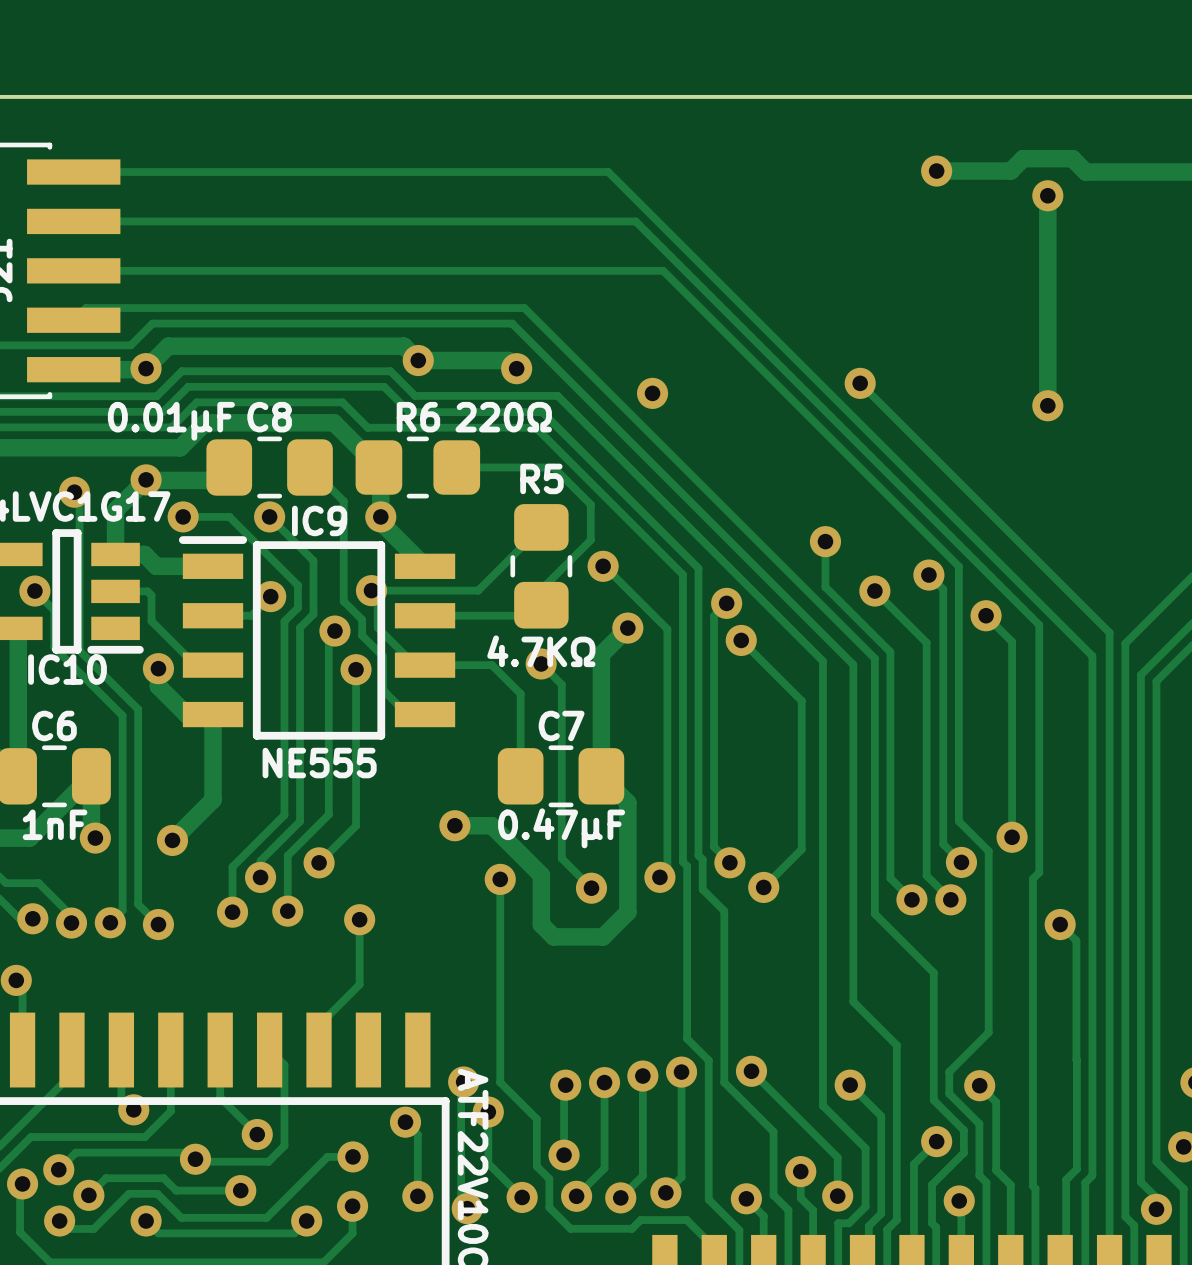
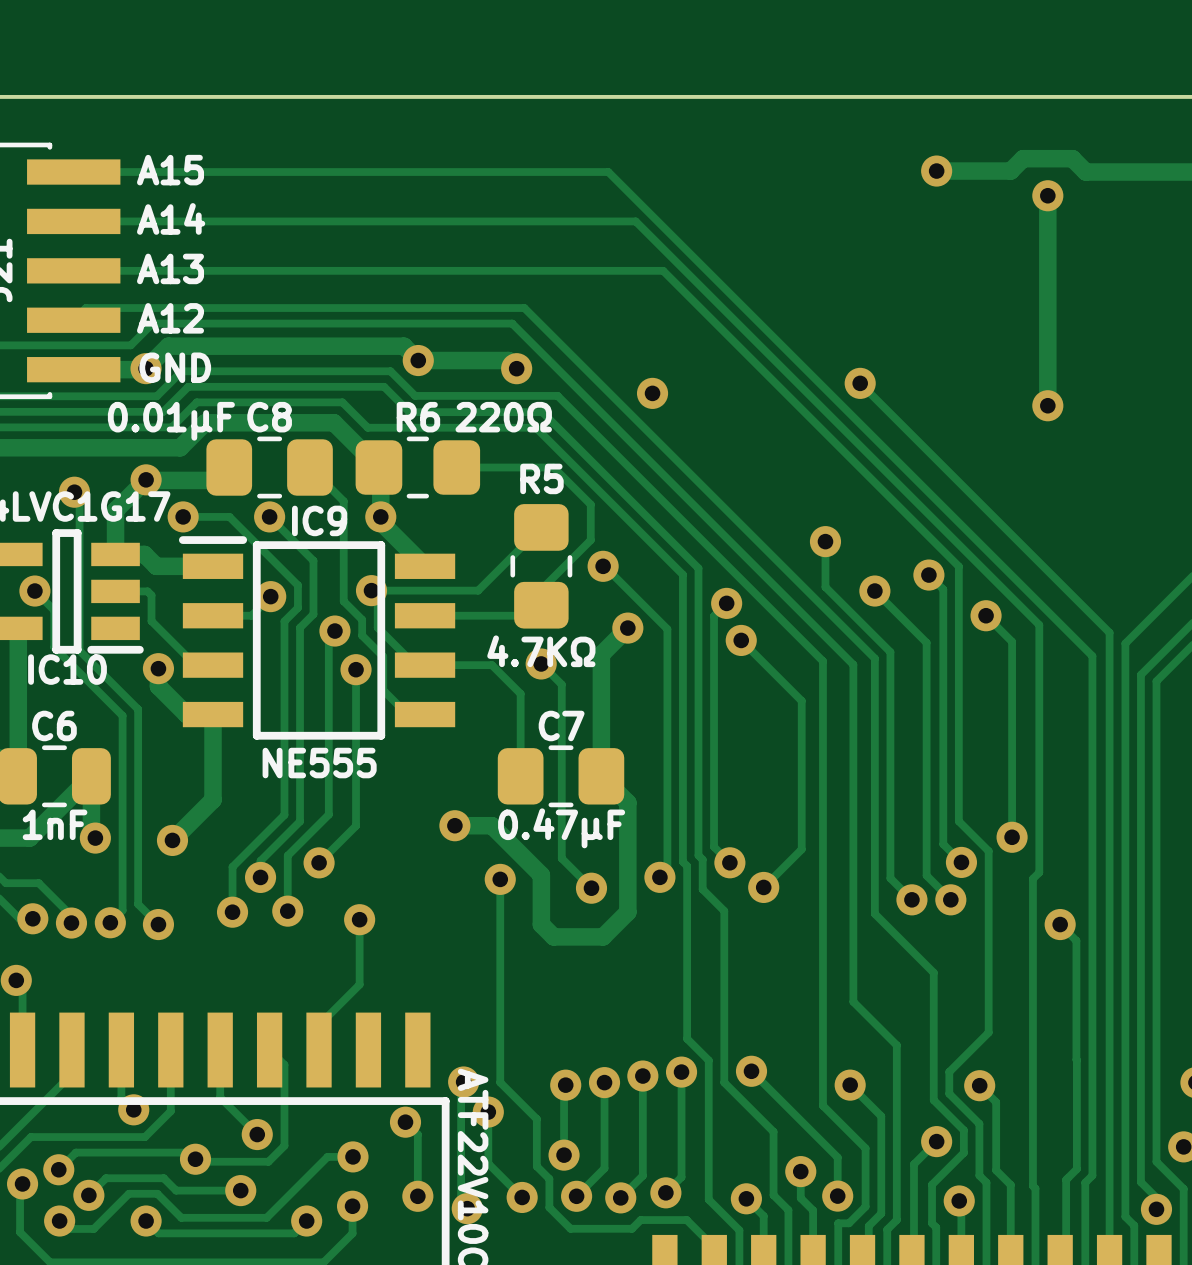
text: none -> A15 (170, 170)
text: none -> A14 (171, 218)
text: none -> A13 (170, 268)
text: none -> A12 (170, 318)
text: none -> GND (175, 367)

